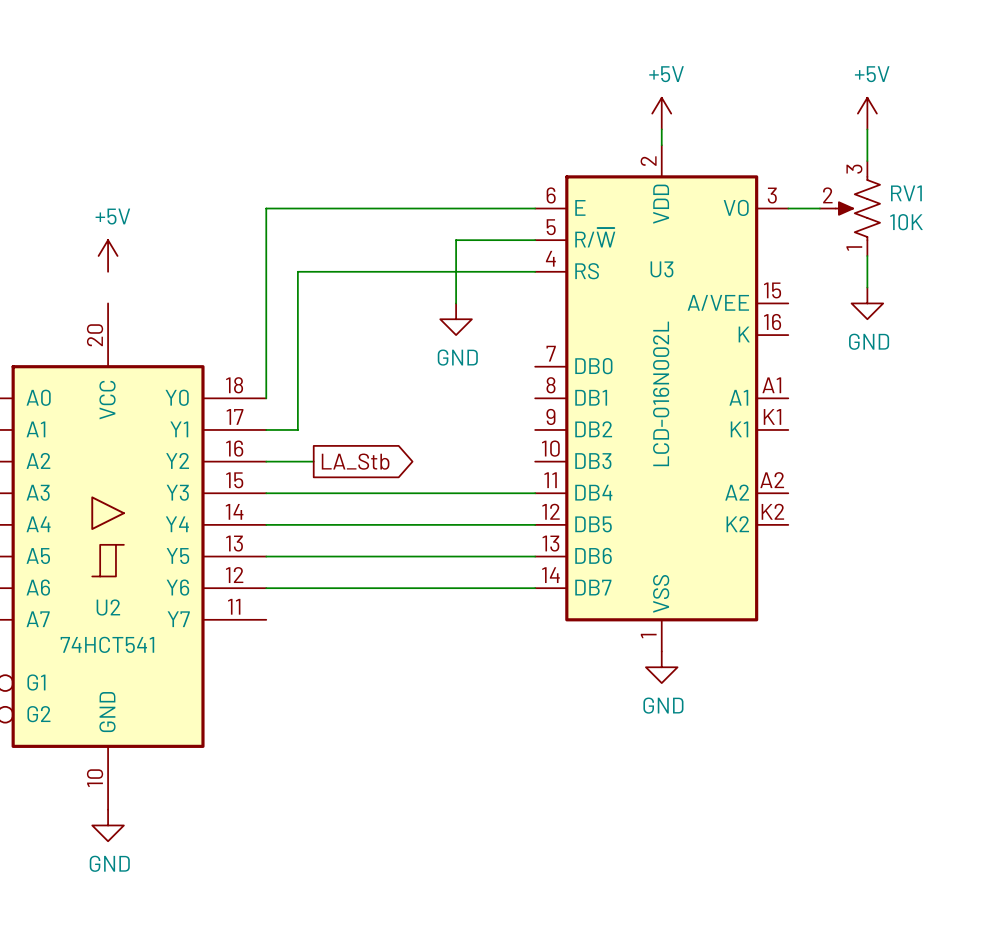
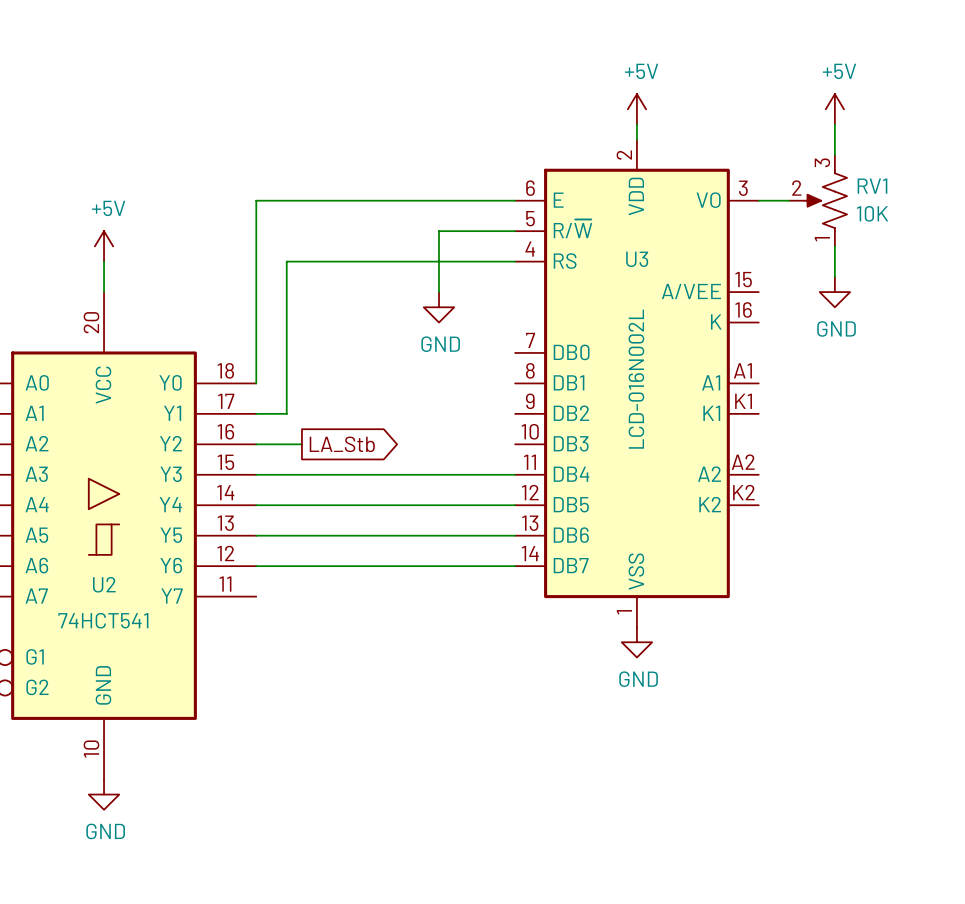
wire: none -> (104, 261) (104, 292)

